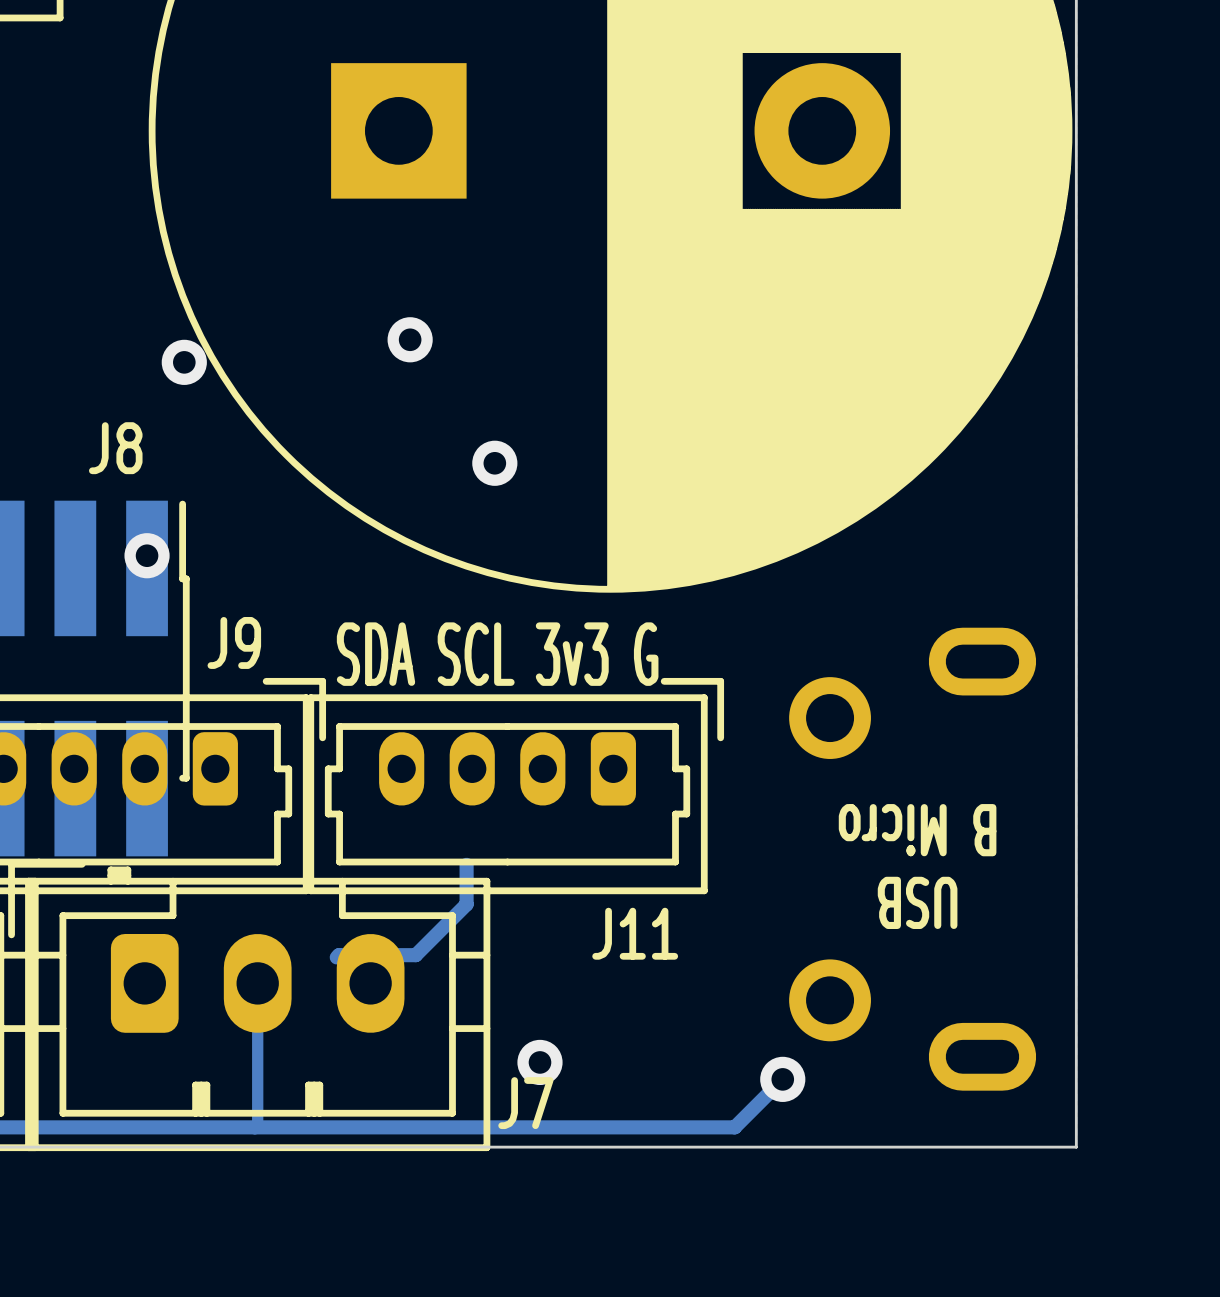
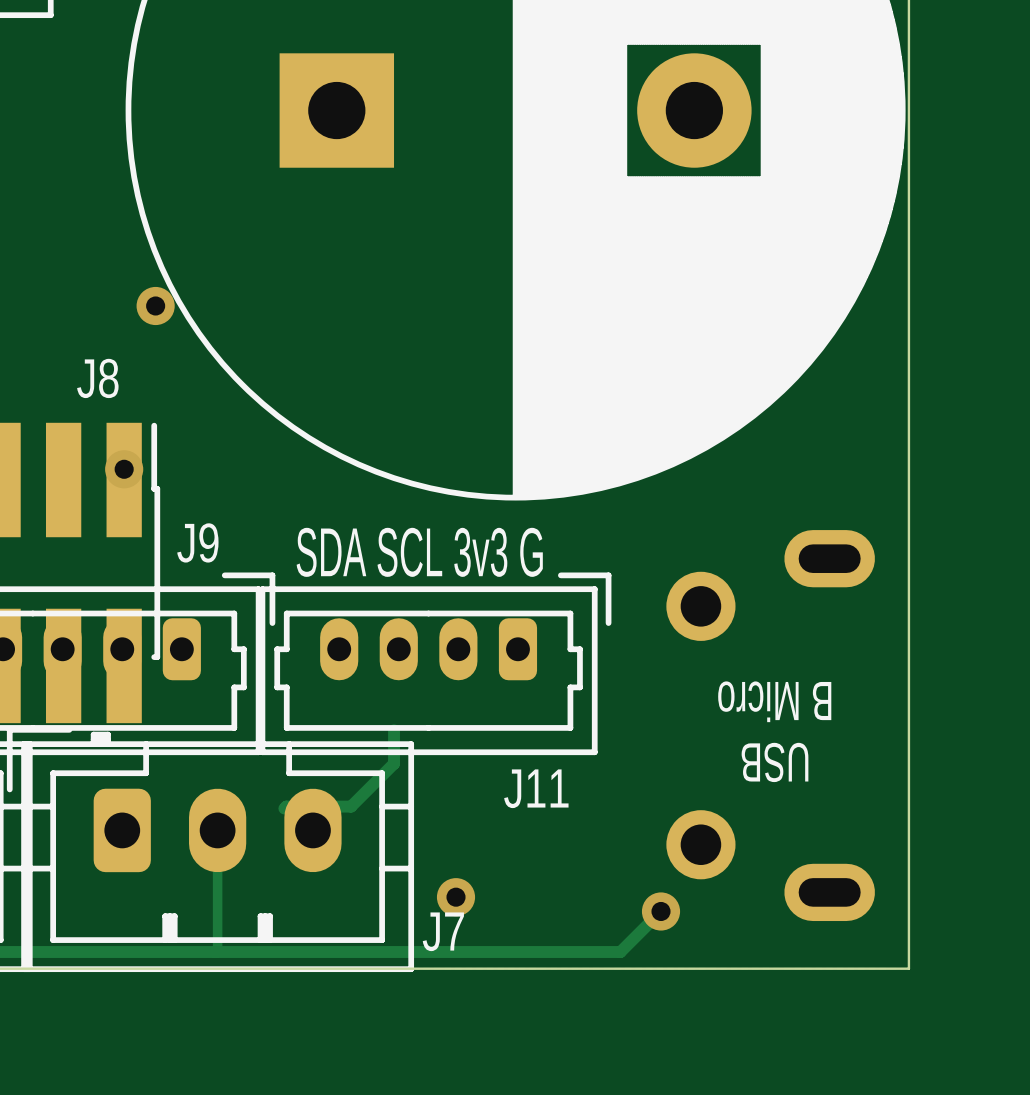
via: (410, 339) -> none
via: (494, 463) -> none

